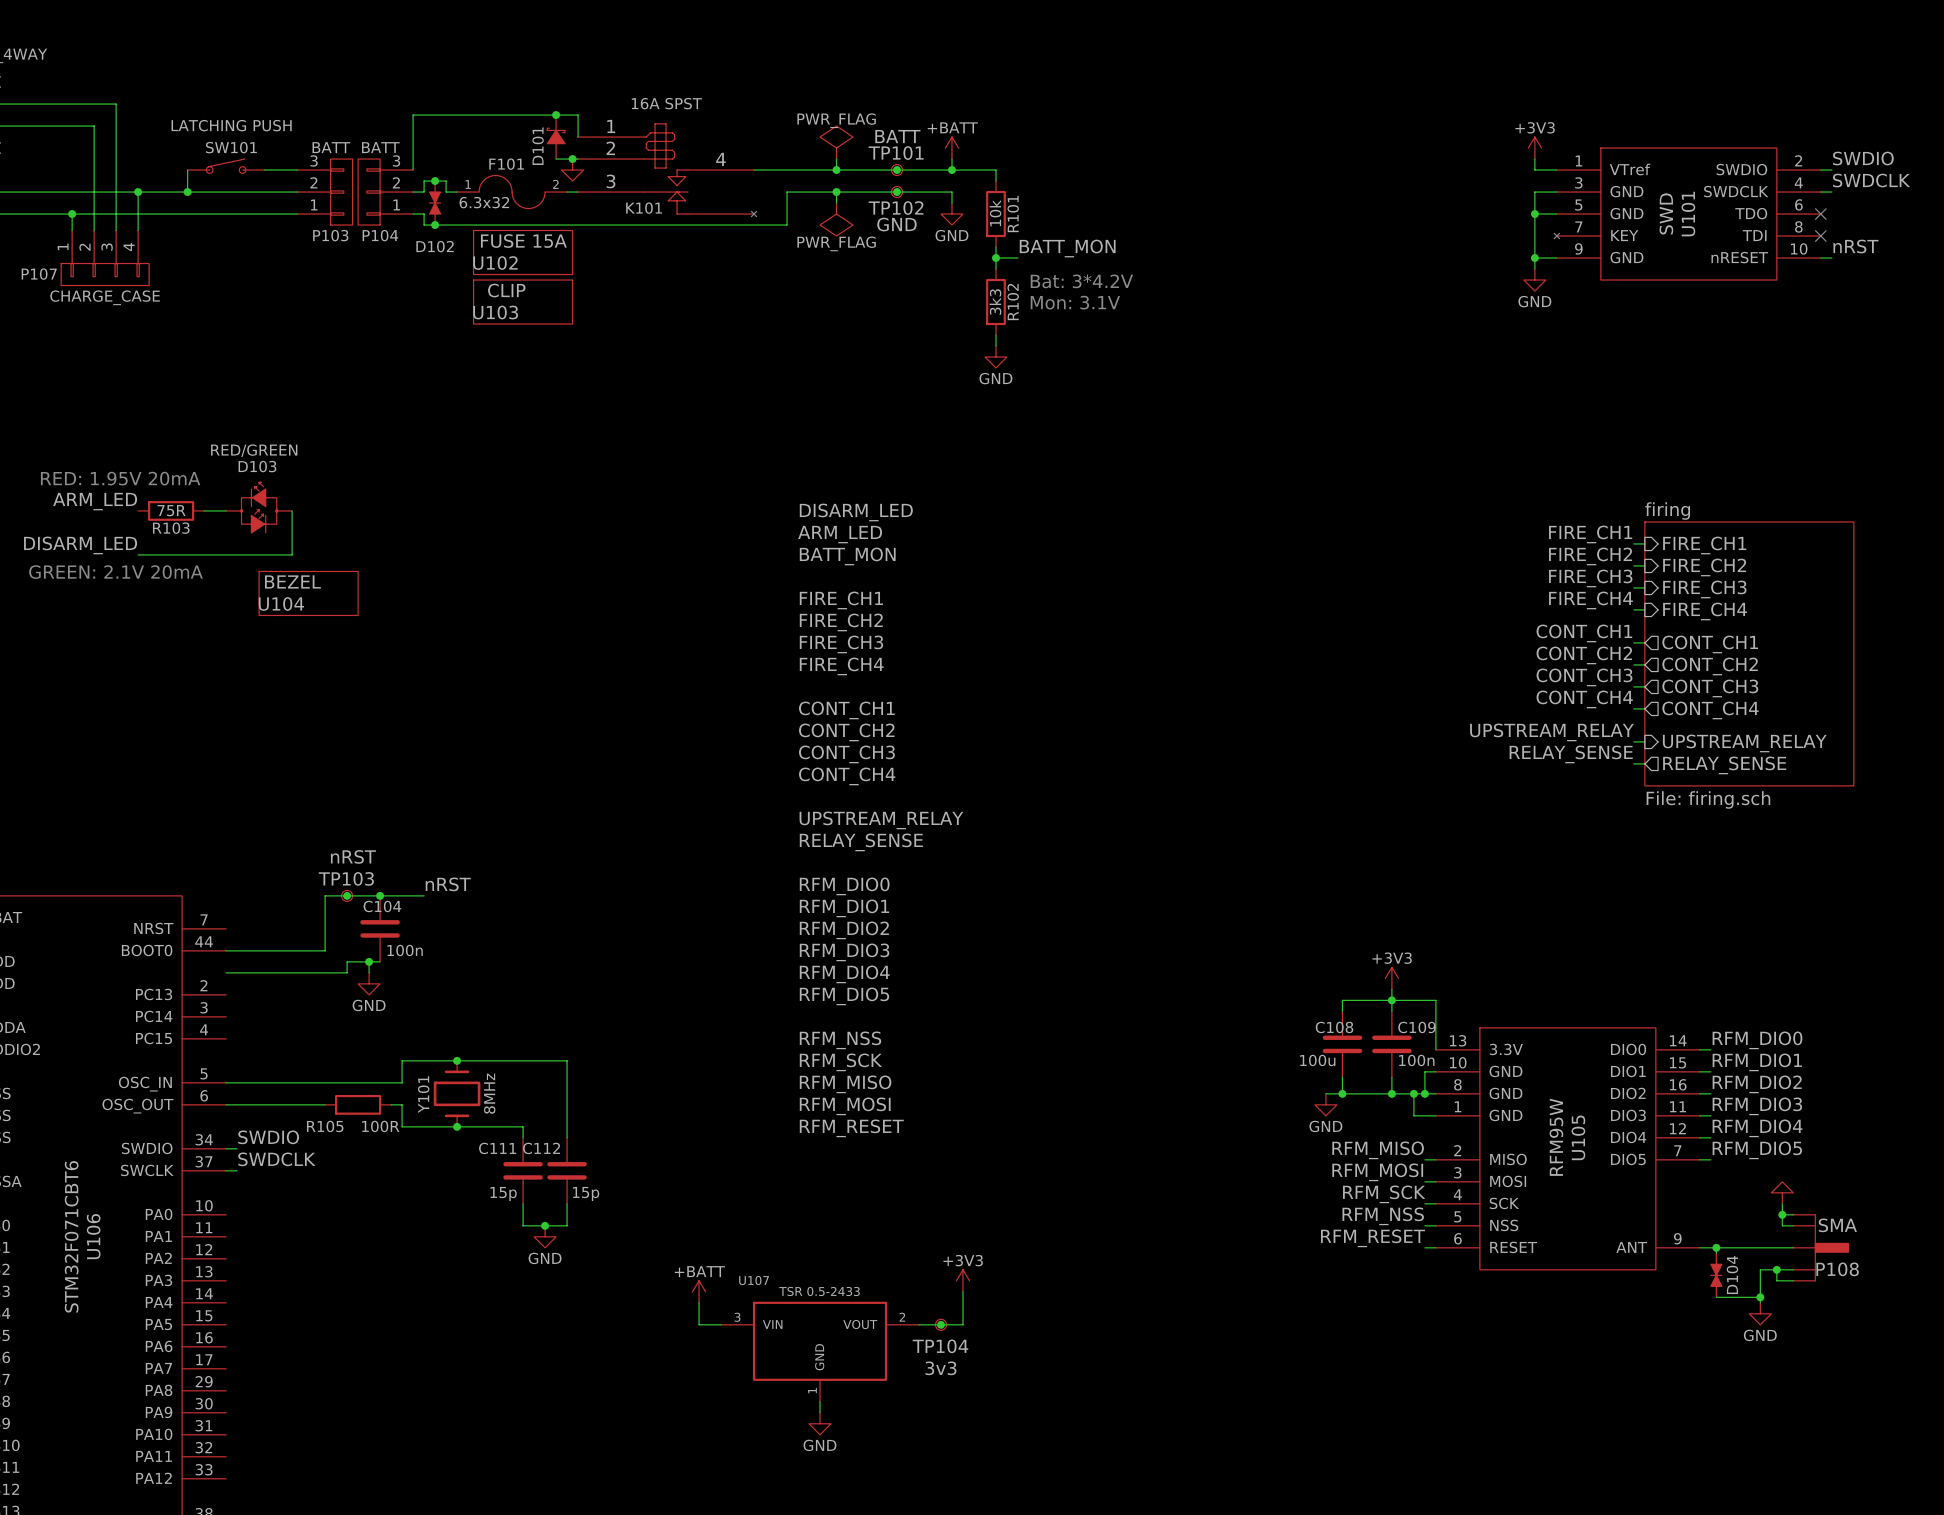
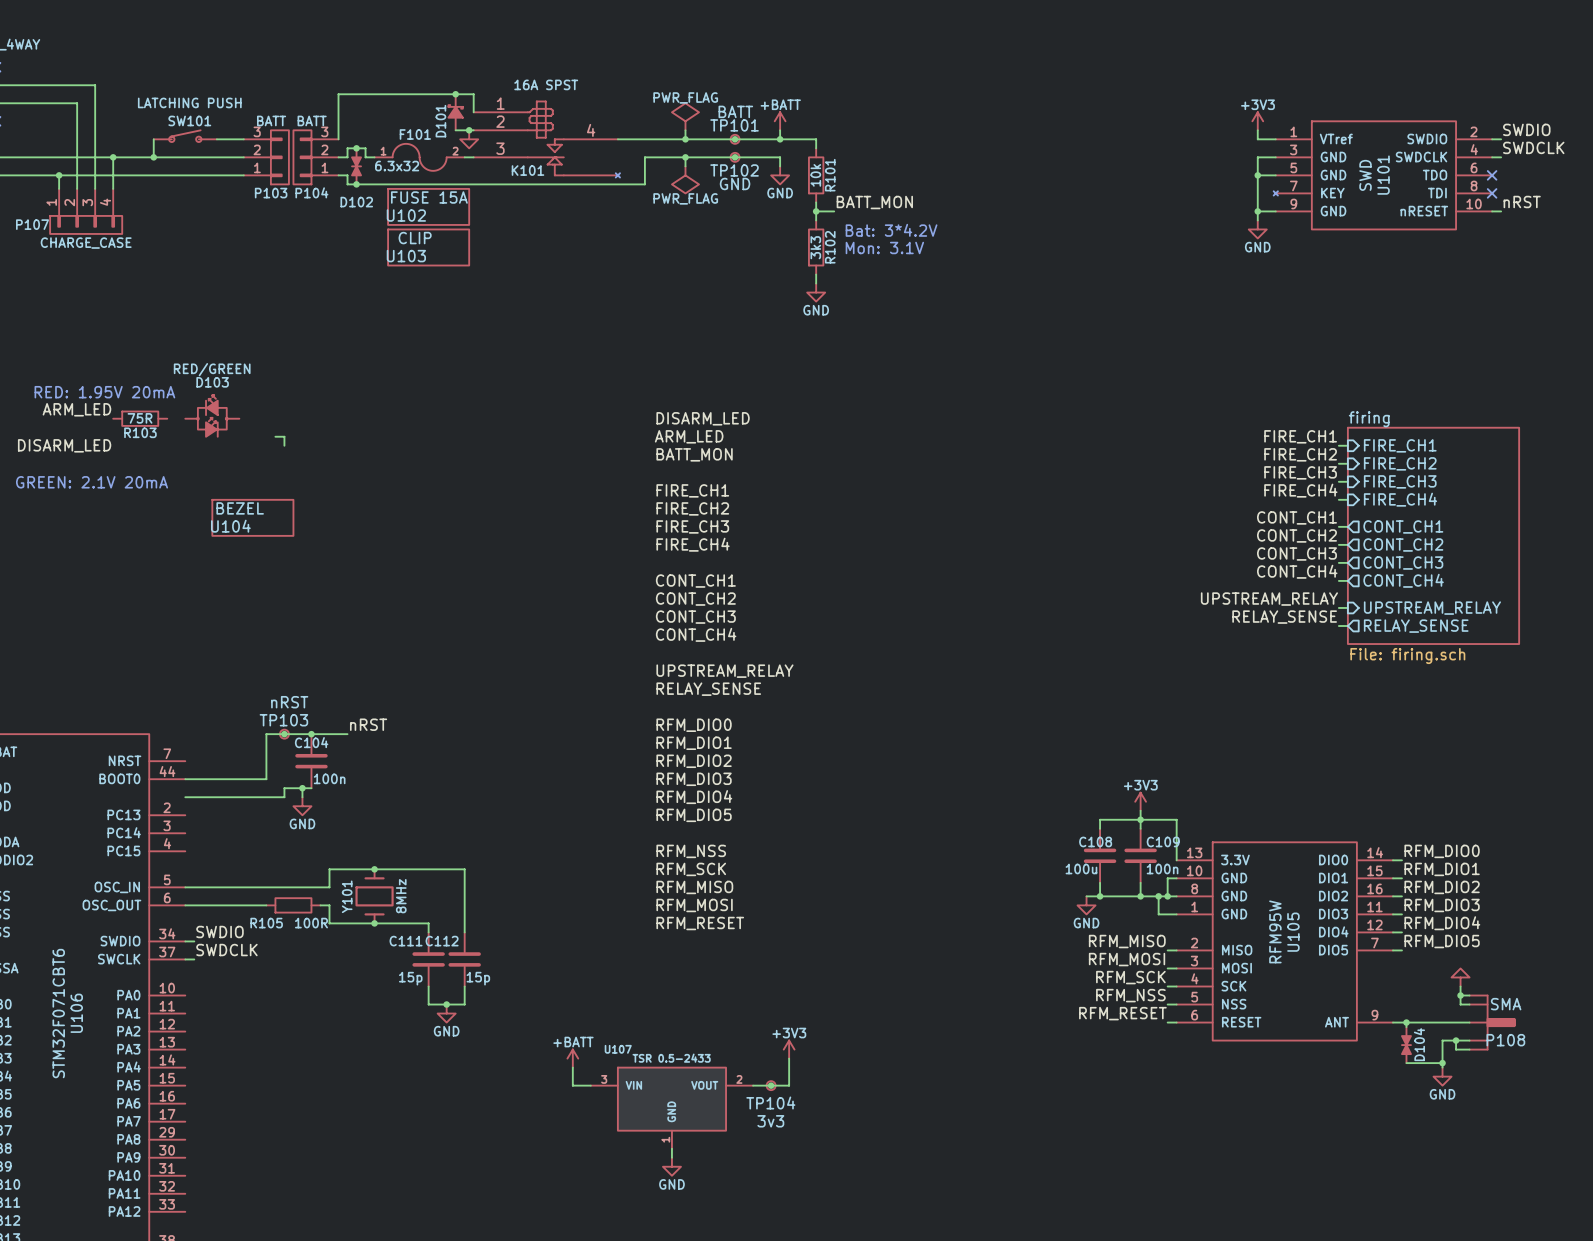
wire: (204, 510) (226, 510) -> none
wire: (292, 510) (292, 554) (138, 554) -> none
wire: none -> (275, 436) (284, 436) (284, 445)
text position: GREEN: 2.1V 20mA (116, 572) -> GREEN: 2.1V 20mA (92, 482)
U104 position: (308, 593) -> (252, 517)

